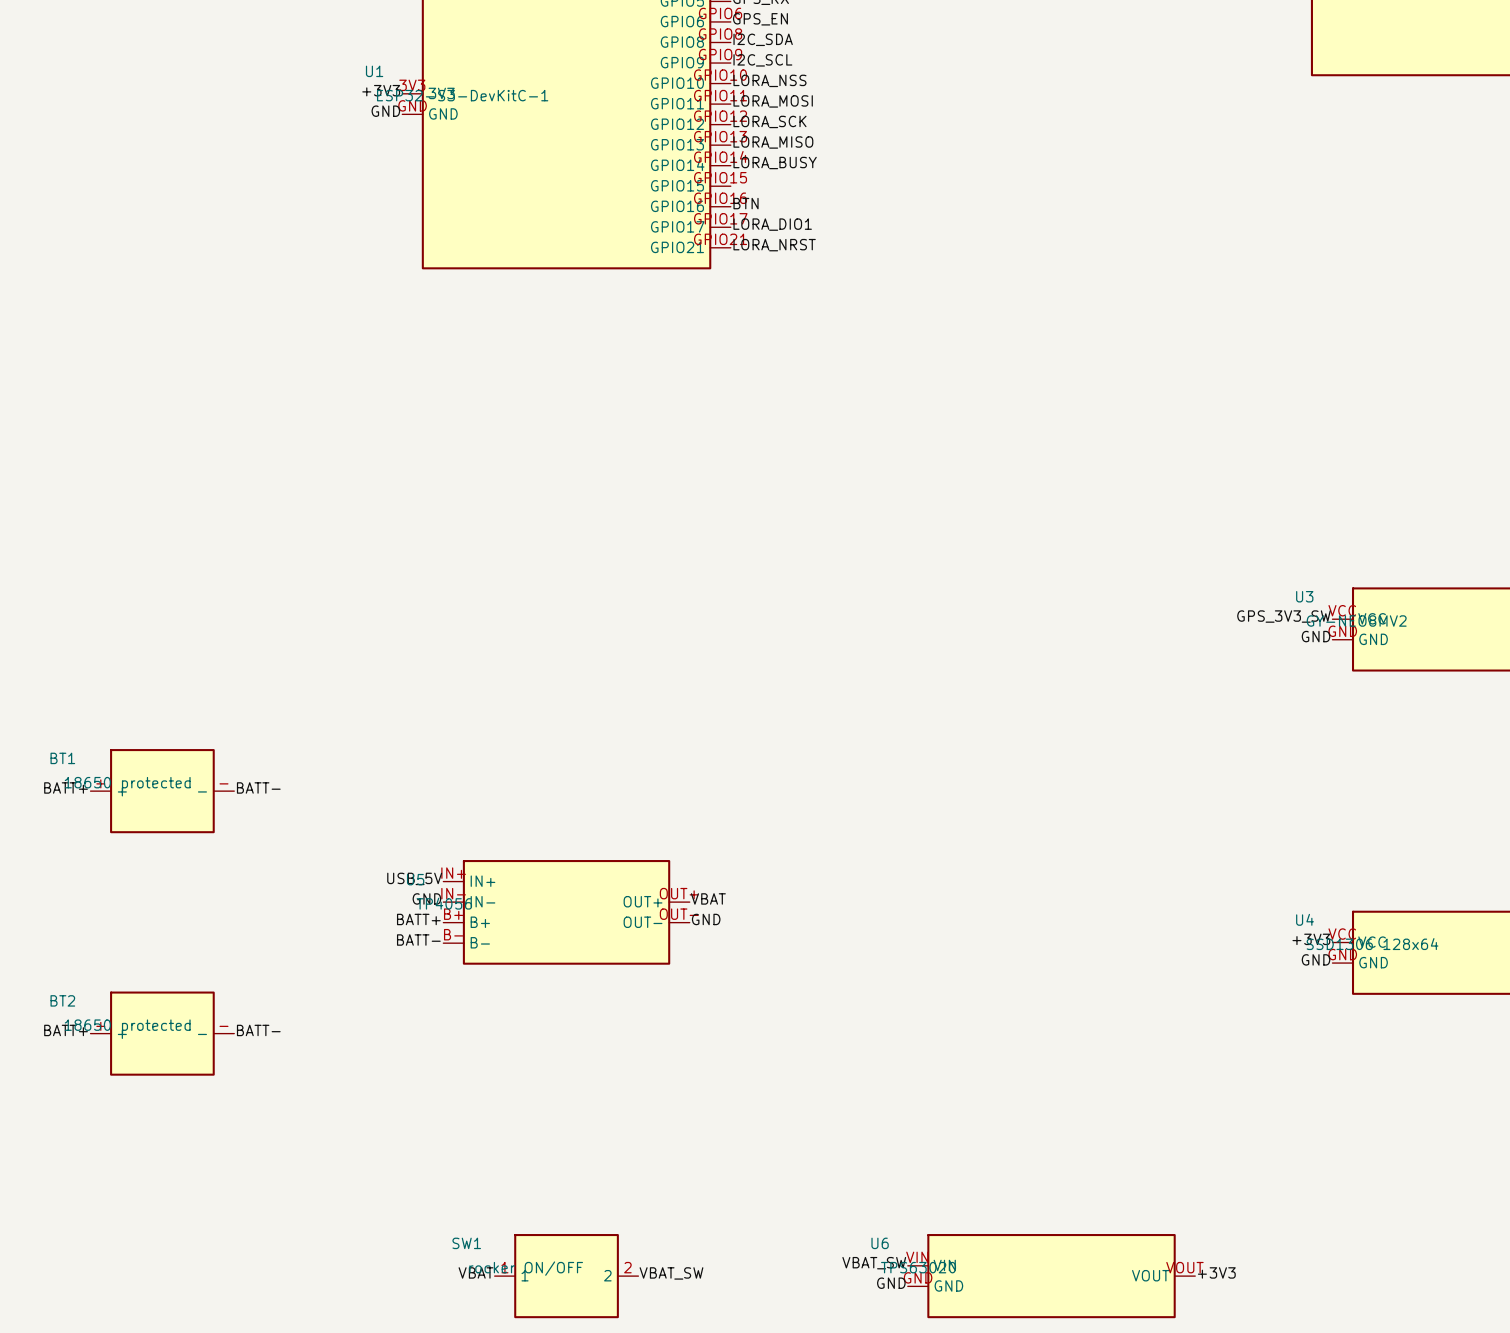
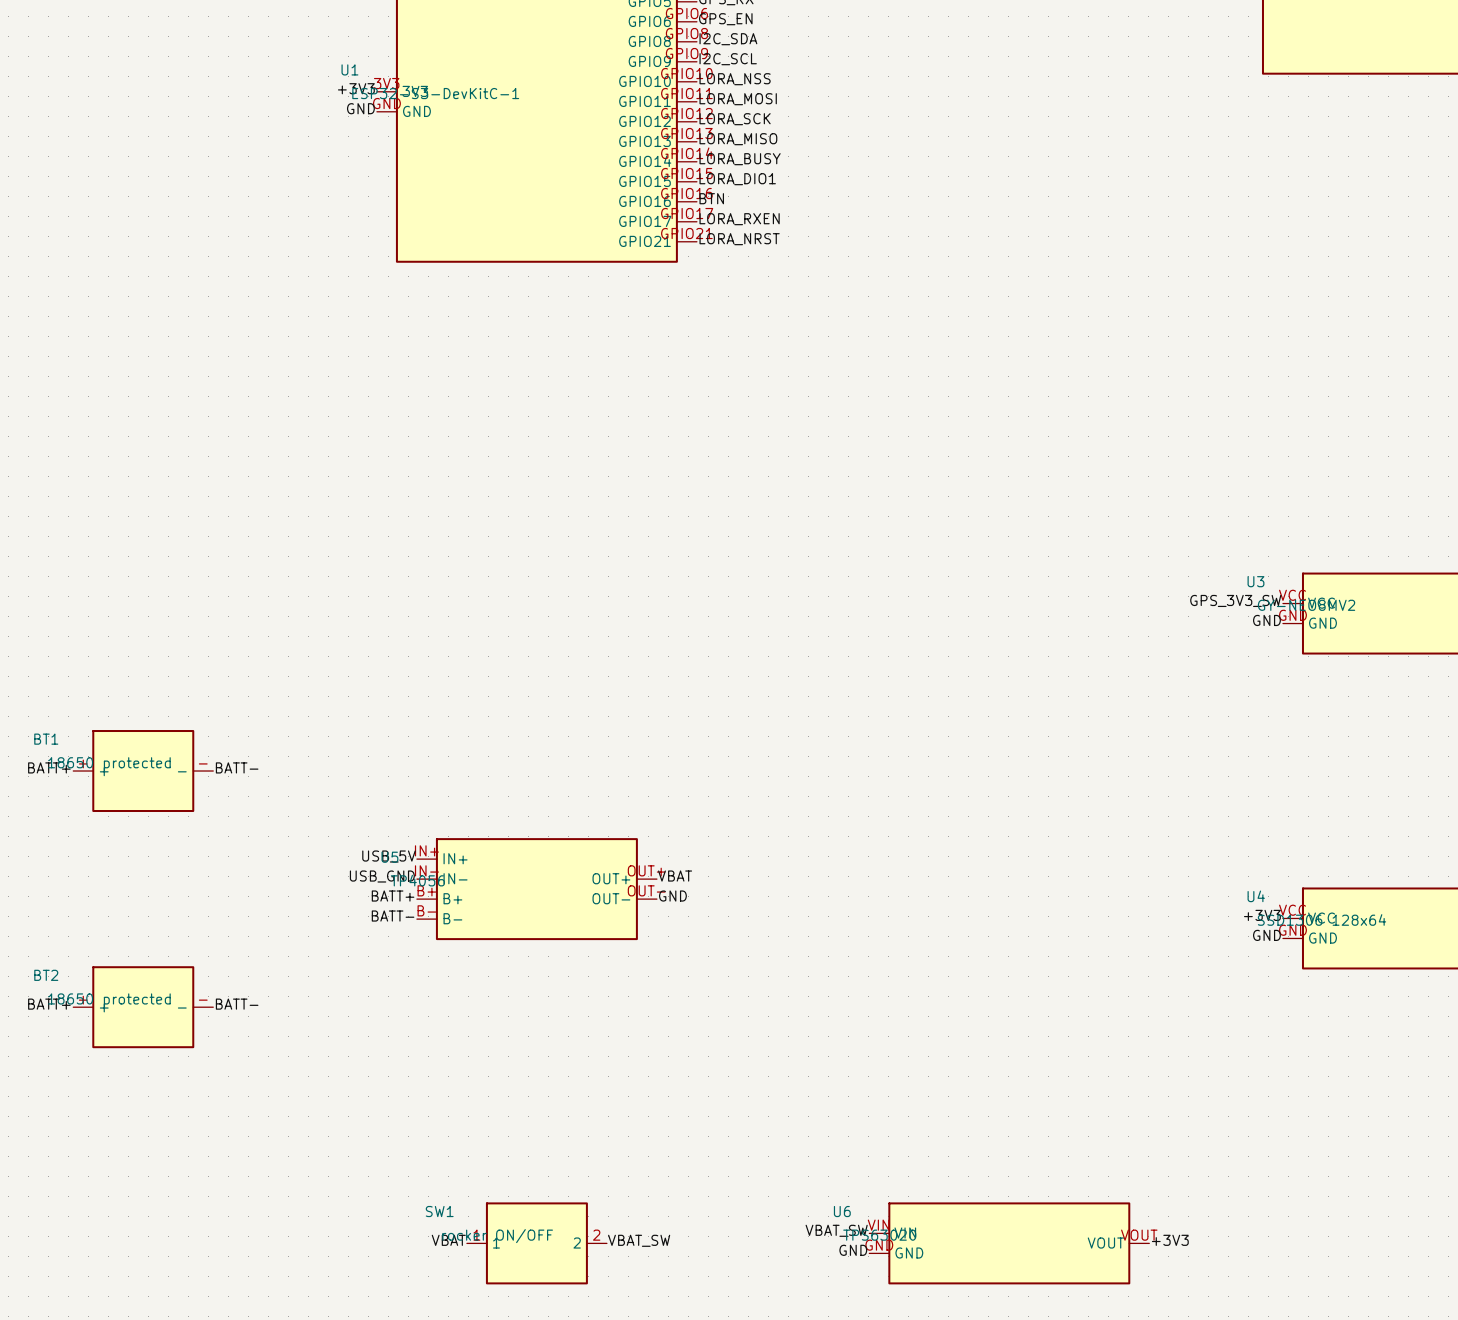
label: none -> LORA_DIO1 (737, 179)
label: LORA_DIO1 (772, 224) -> LORA_RXEN (739, 219)
label: GND (426, 898) -> USB_GND (382, 876)

